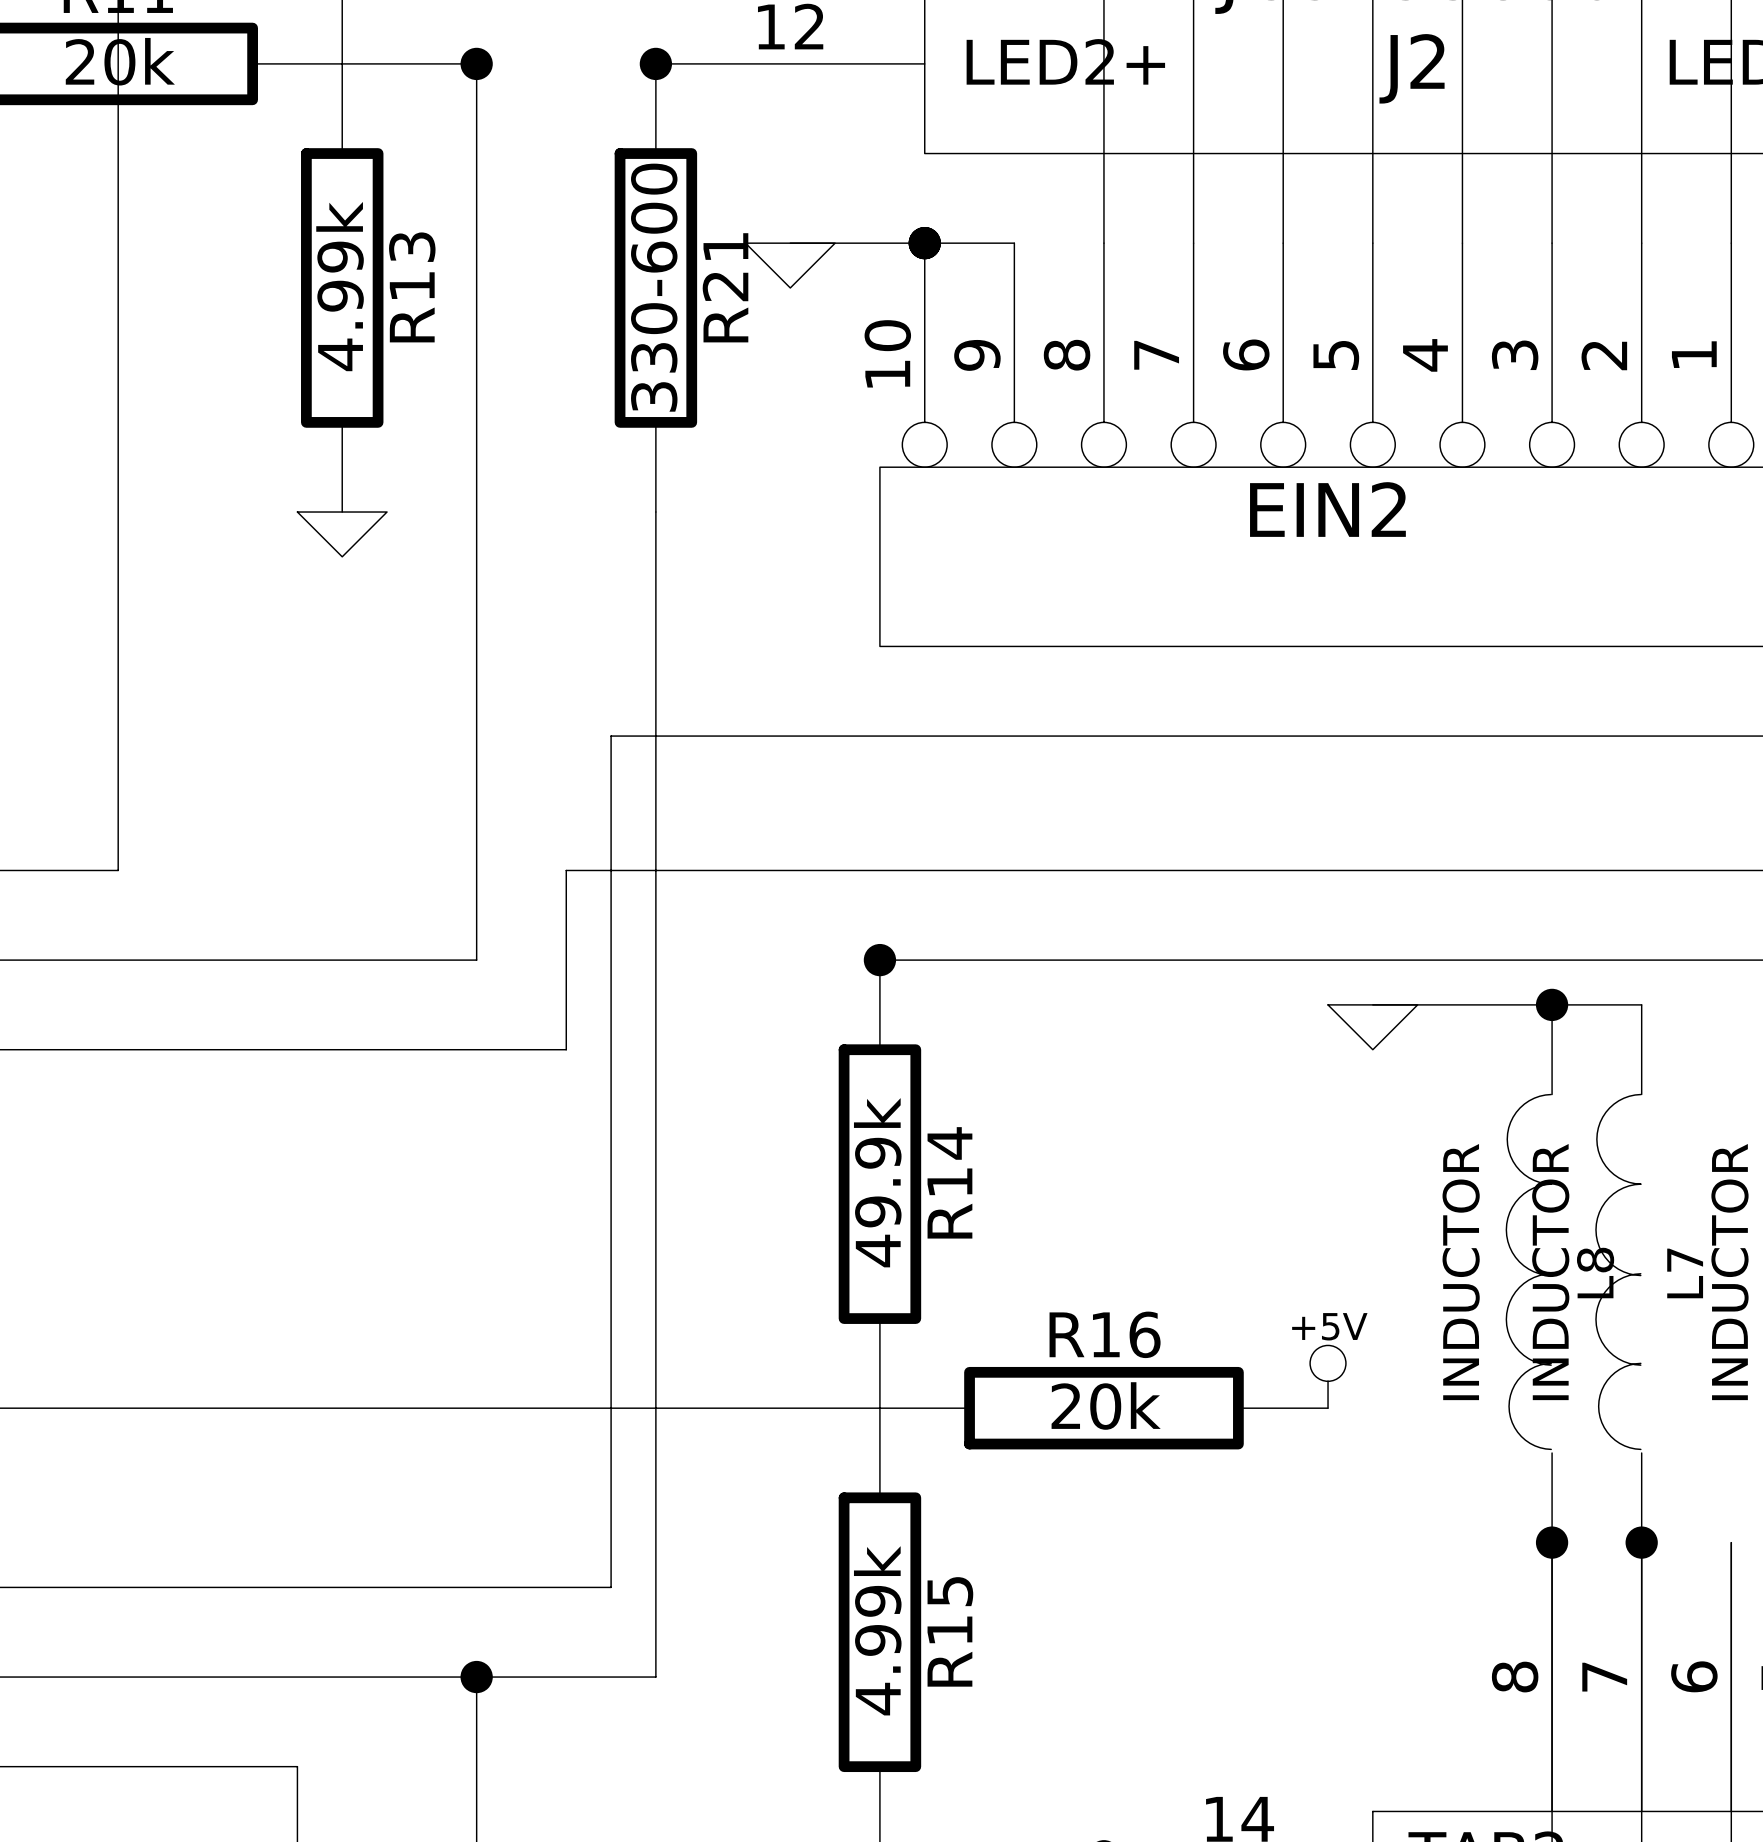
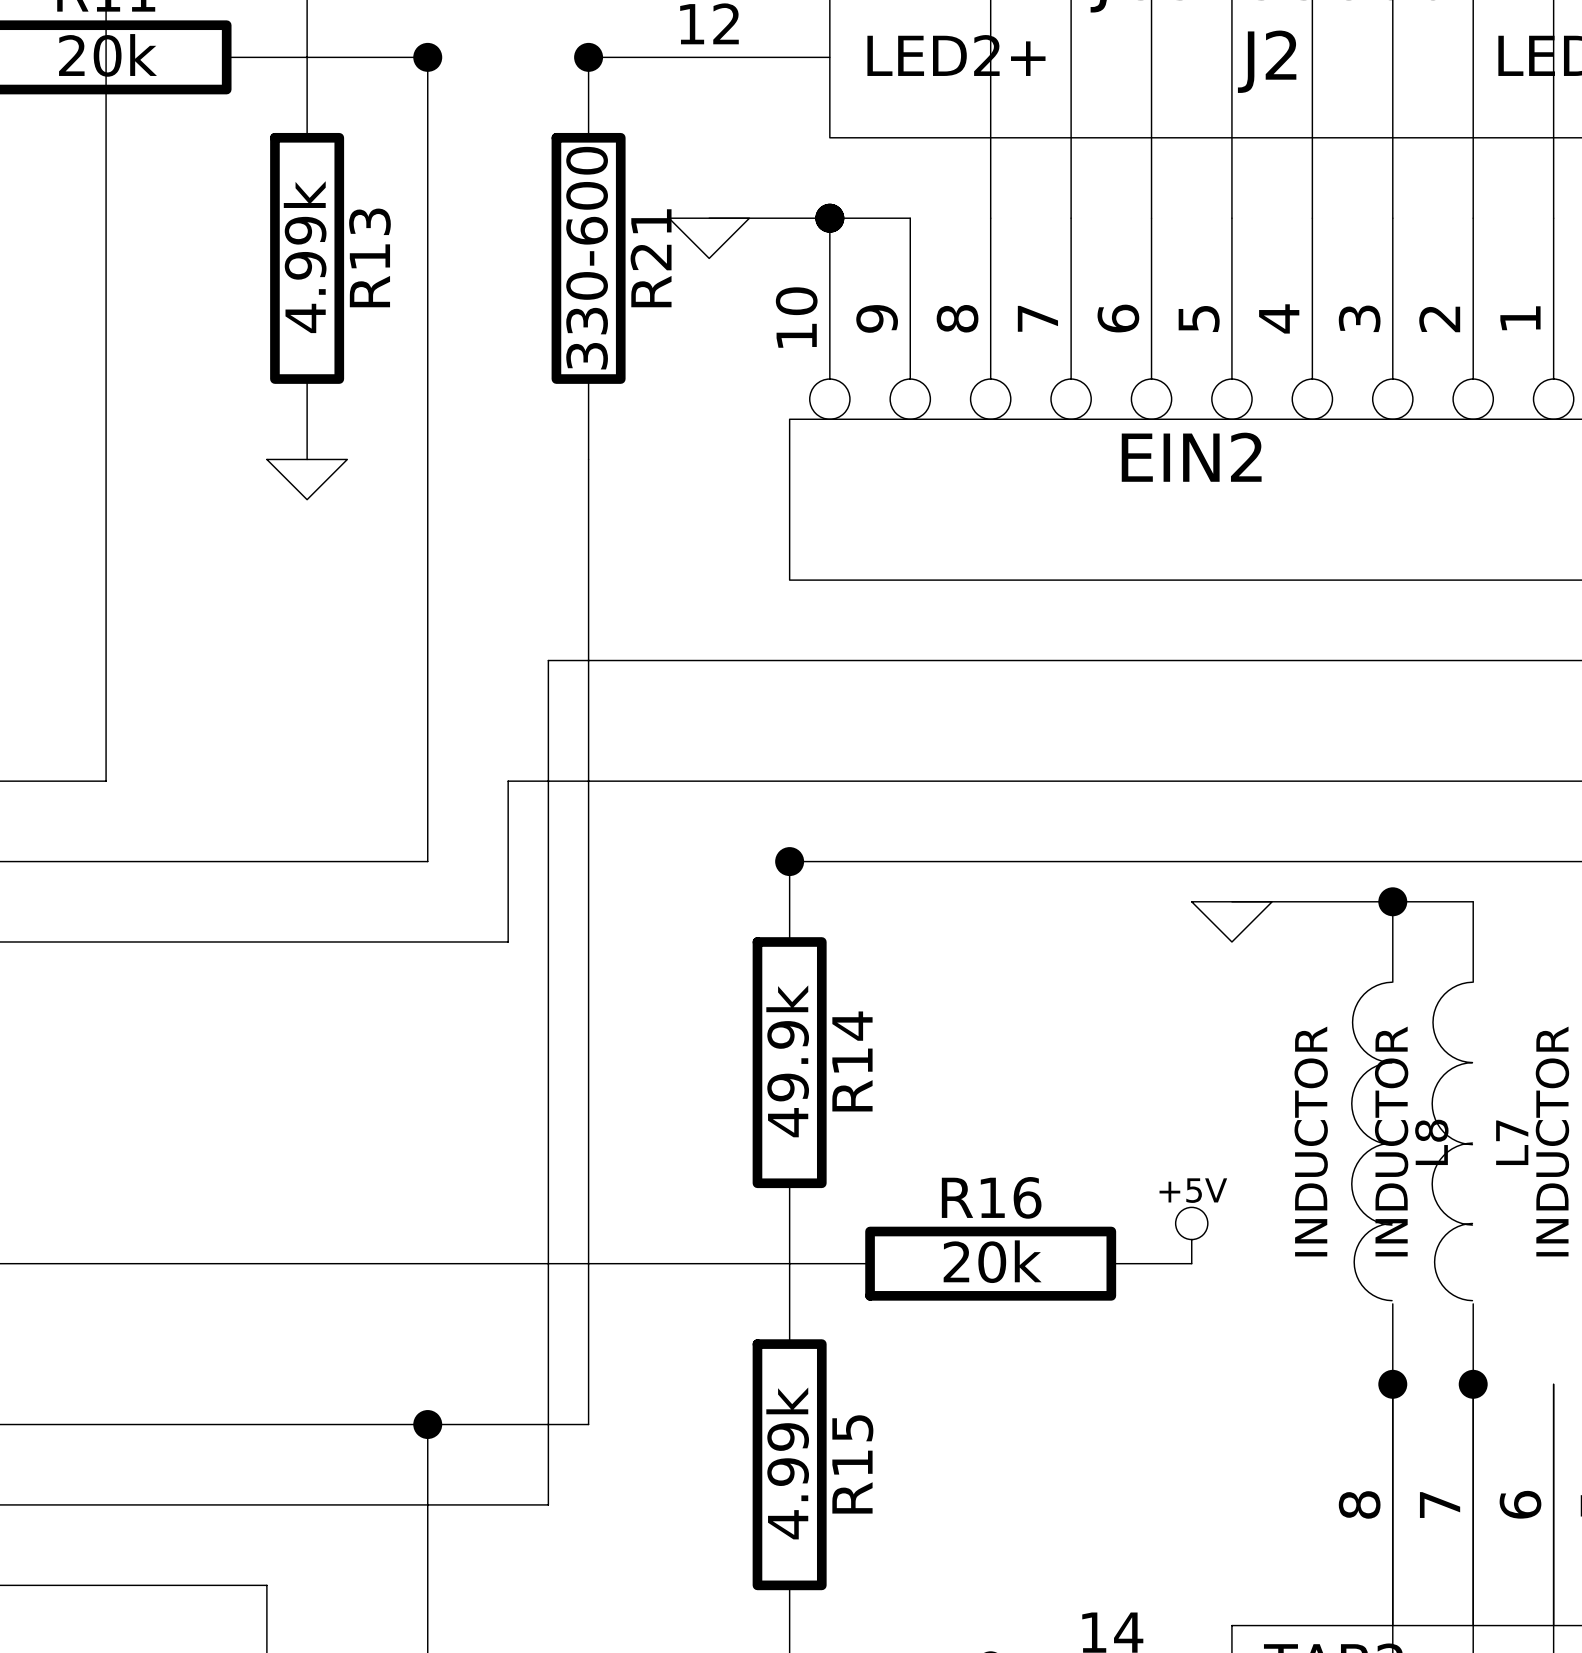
wire: none -> (427, 1424) (427, 1504)
wire: (655, 1587) (655, 1677) (611, 1677) -> (588, 1424) (548, 1424) (548, 1504)
junction position: (476, 1677) -> (427, 1424)

